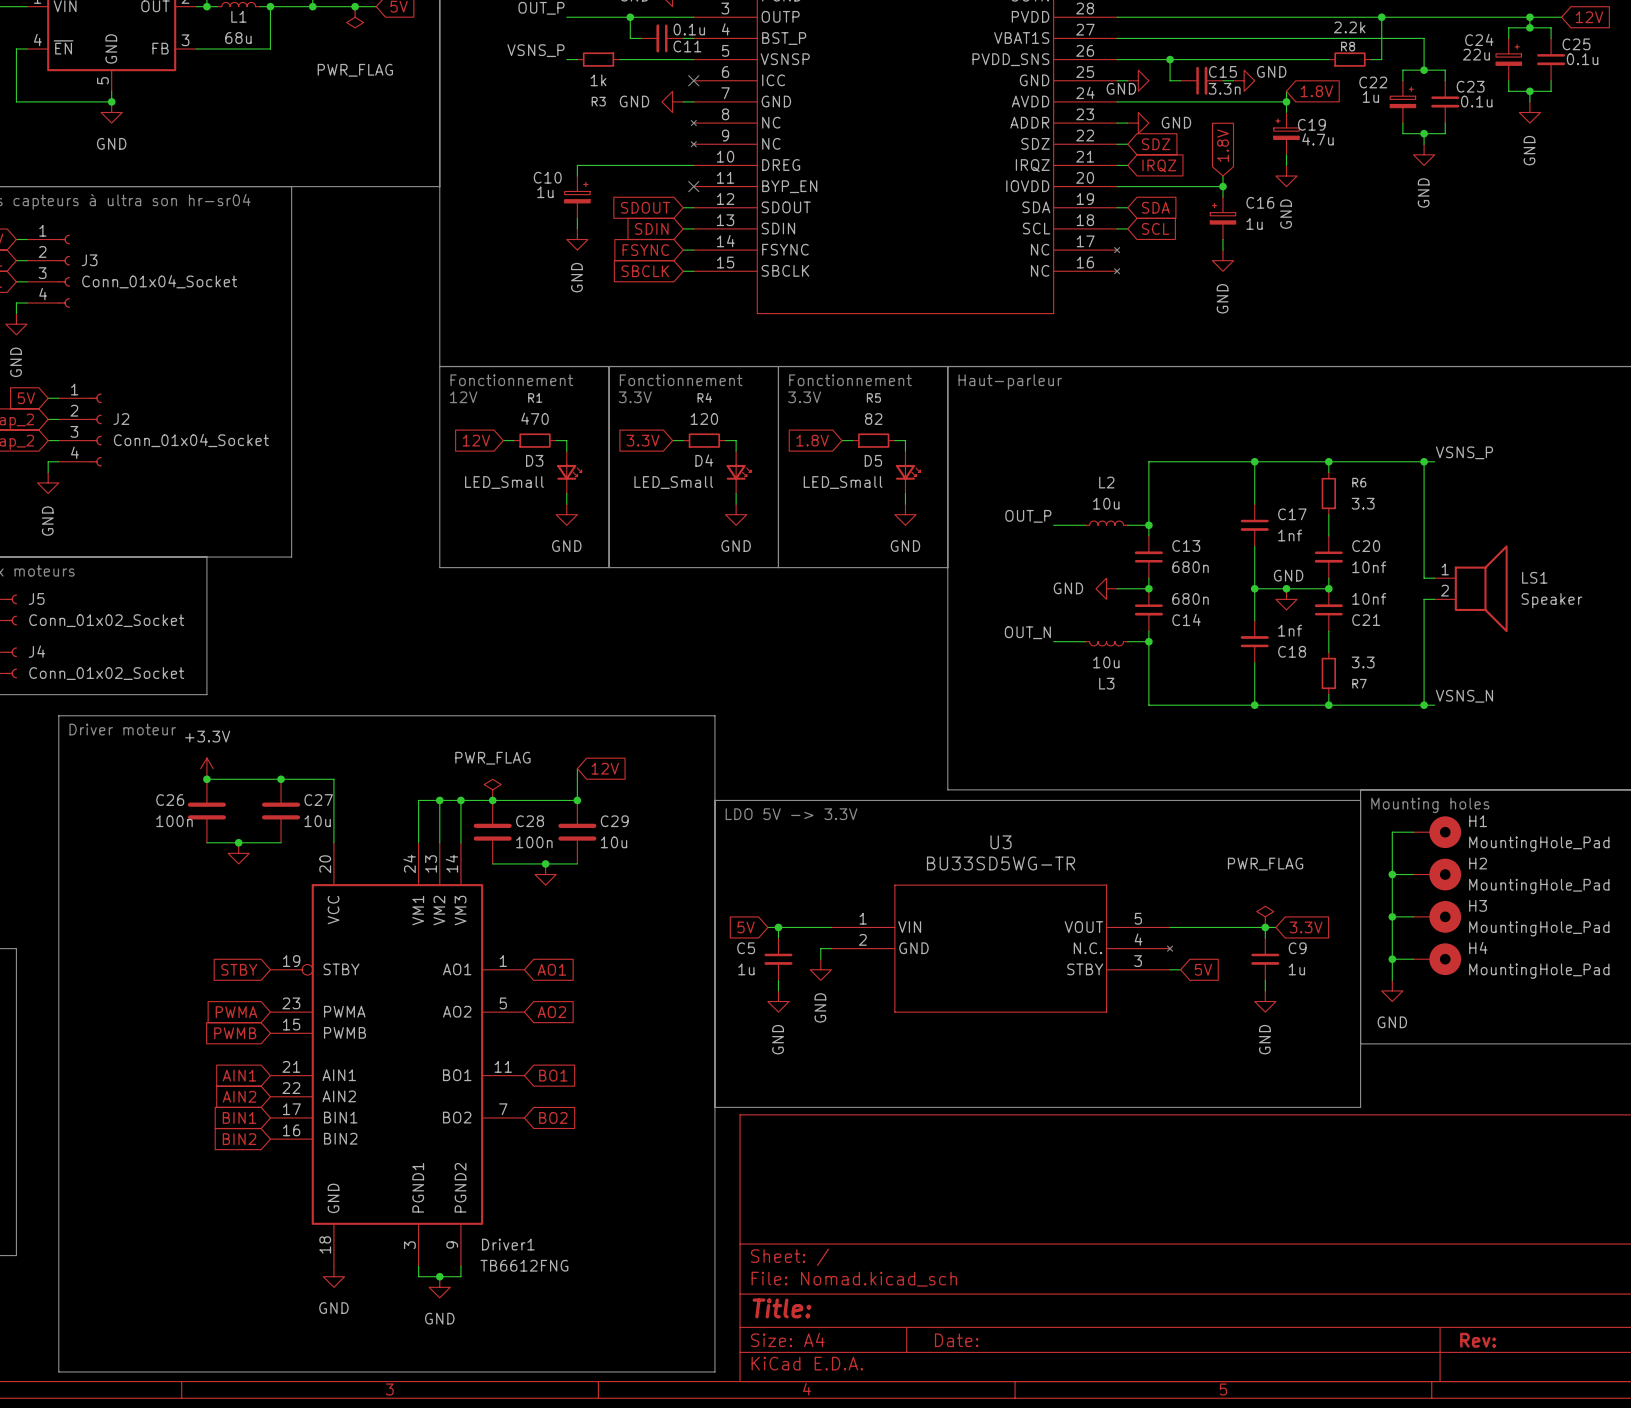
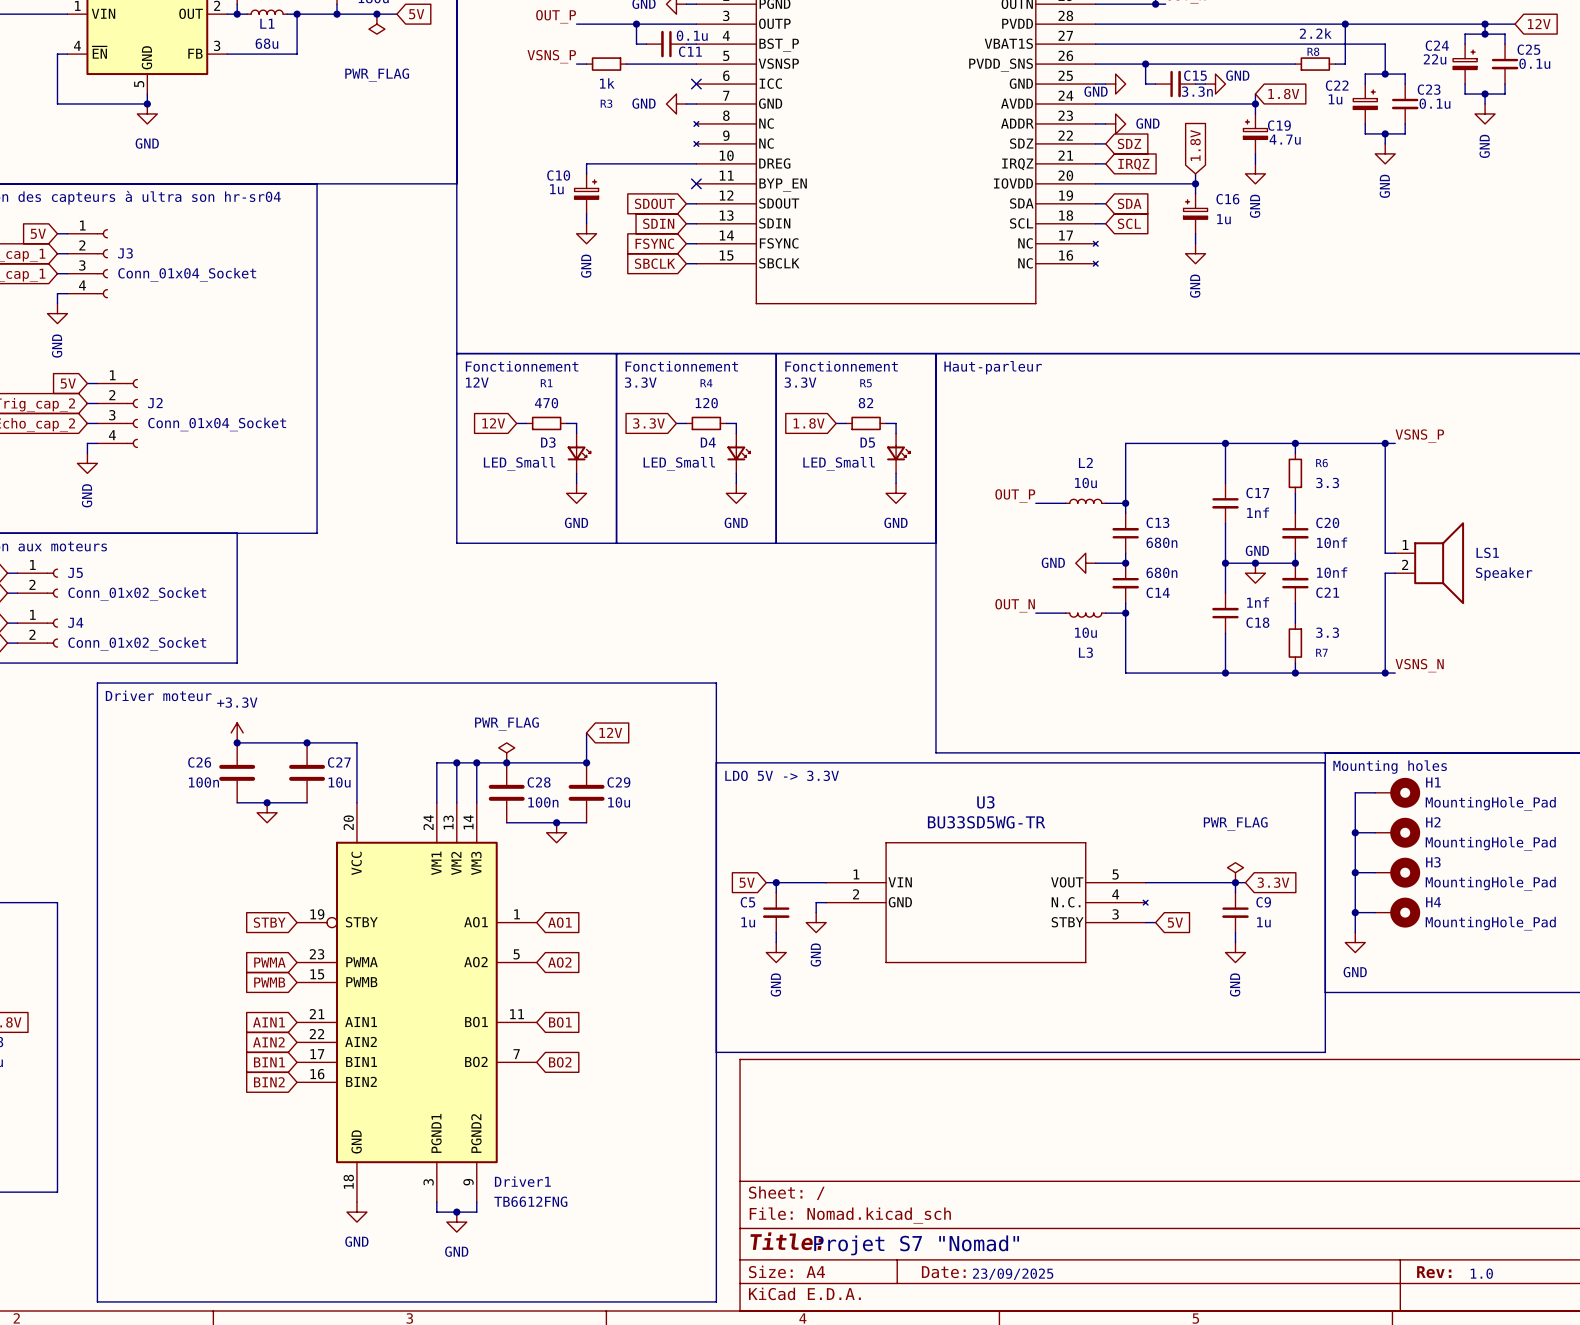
text: none -> Projet S7 "Nomad" (916, 1245)
text: none -> 1.0 (1481, 1273)
text: none -> 23/09/2025 (1013, 1274)

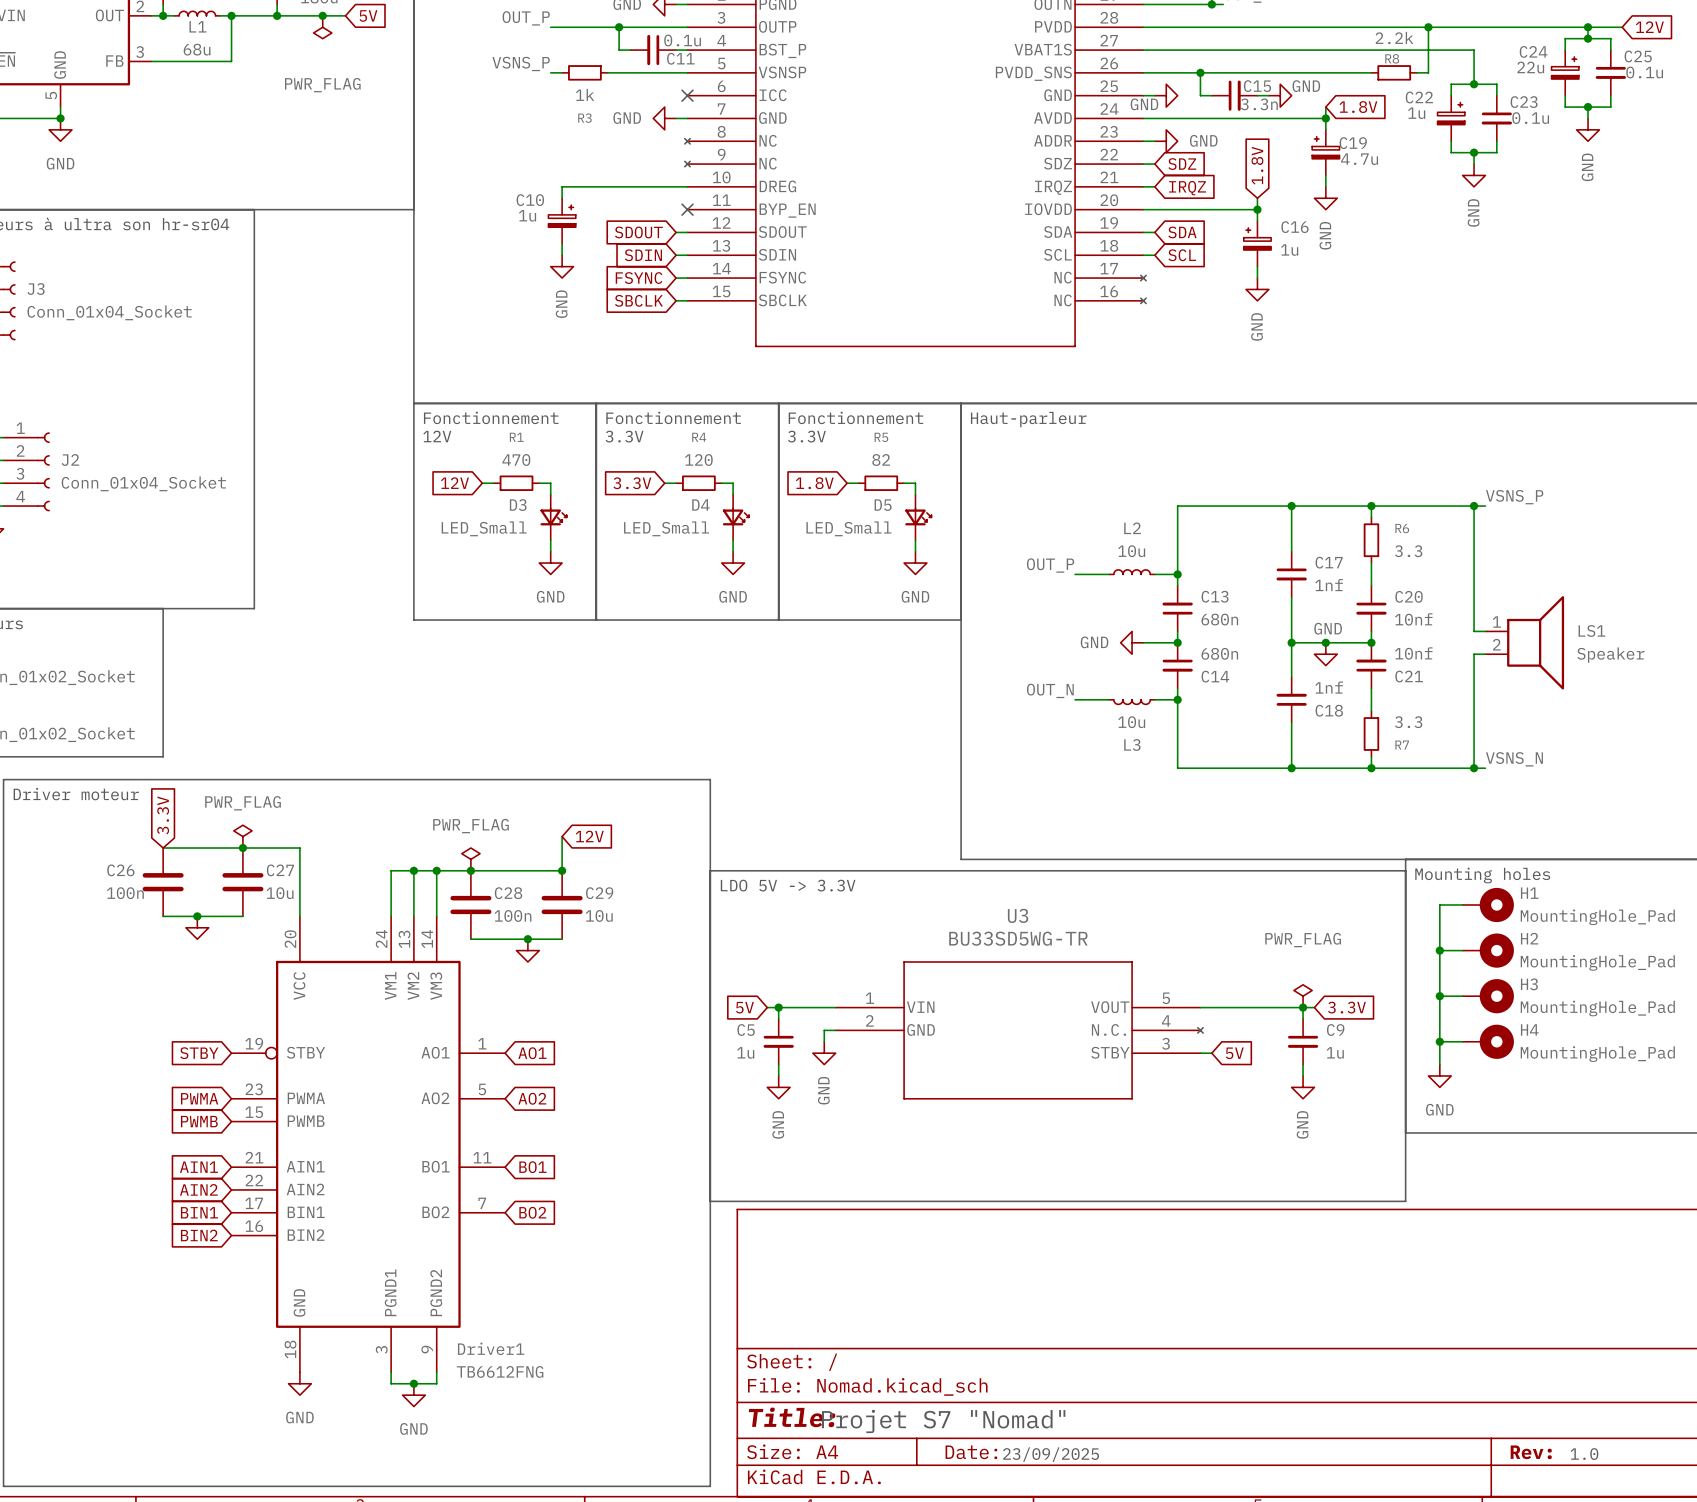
global label: none -> 3.3V (163, 815)
power symbol: +3.3V (237, 732) -> none
power symbol: none -> PWR_FLAG (242, 836)
junction: (237, 742) -> none

